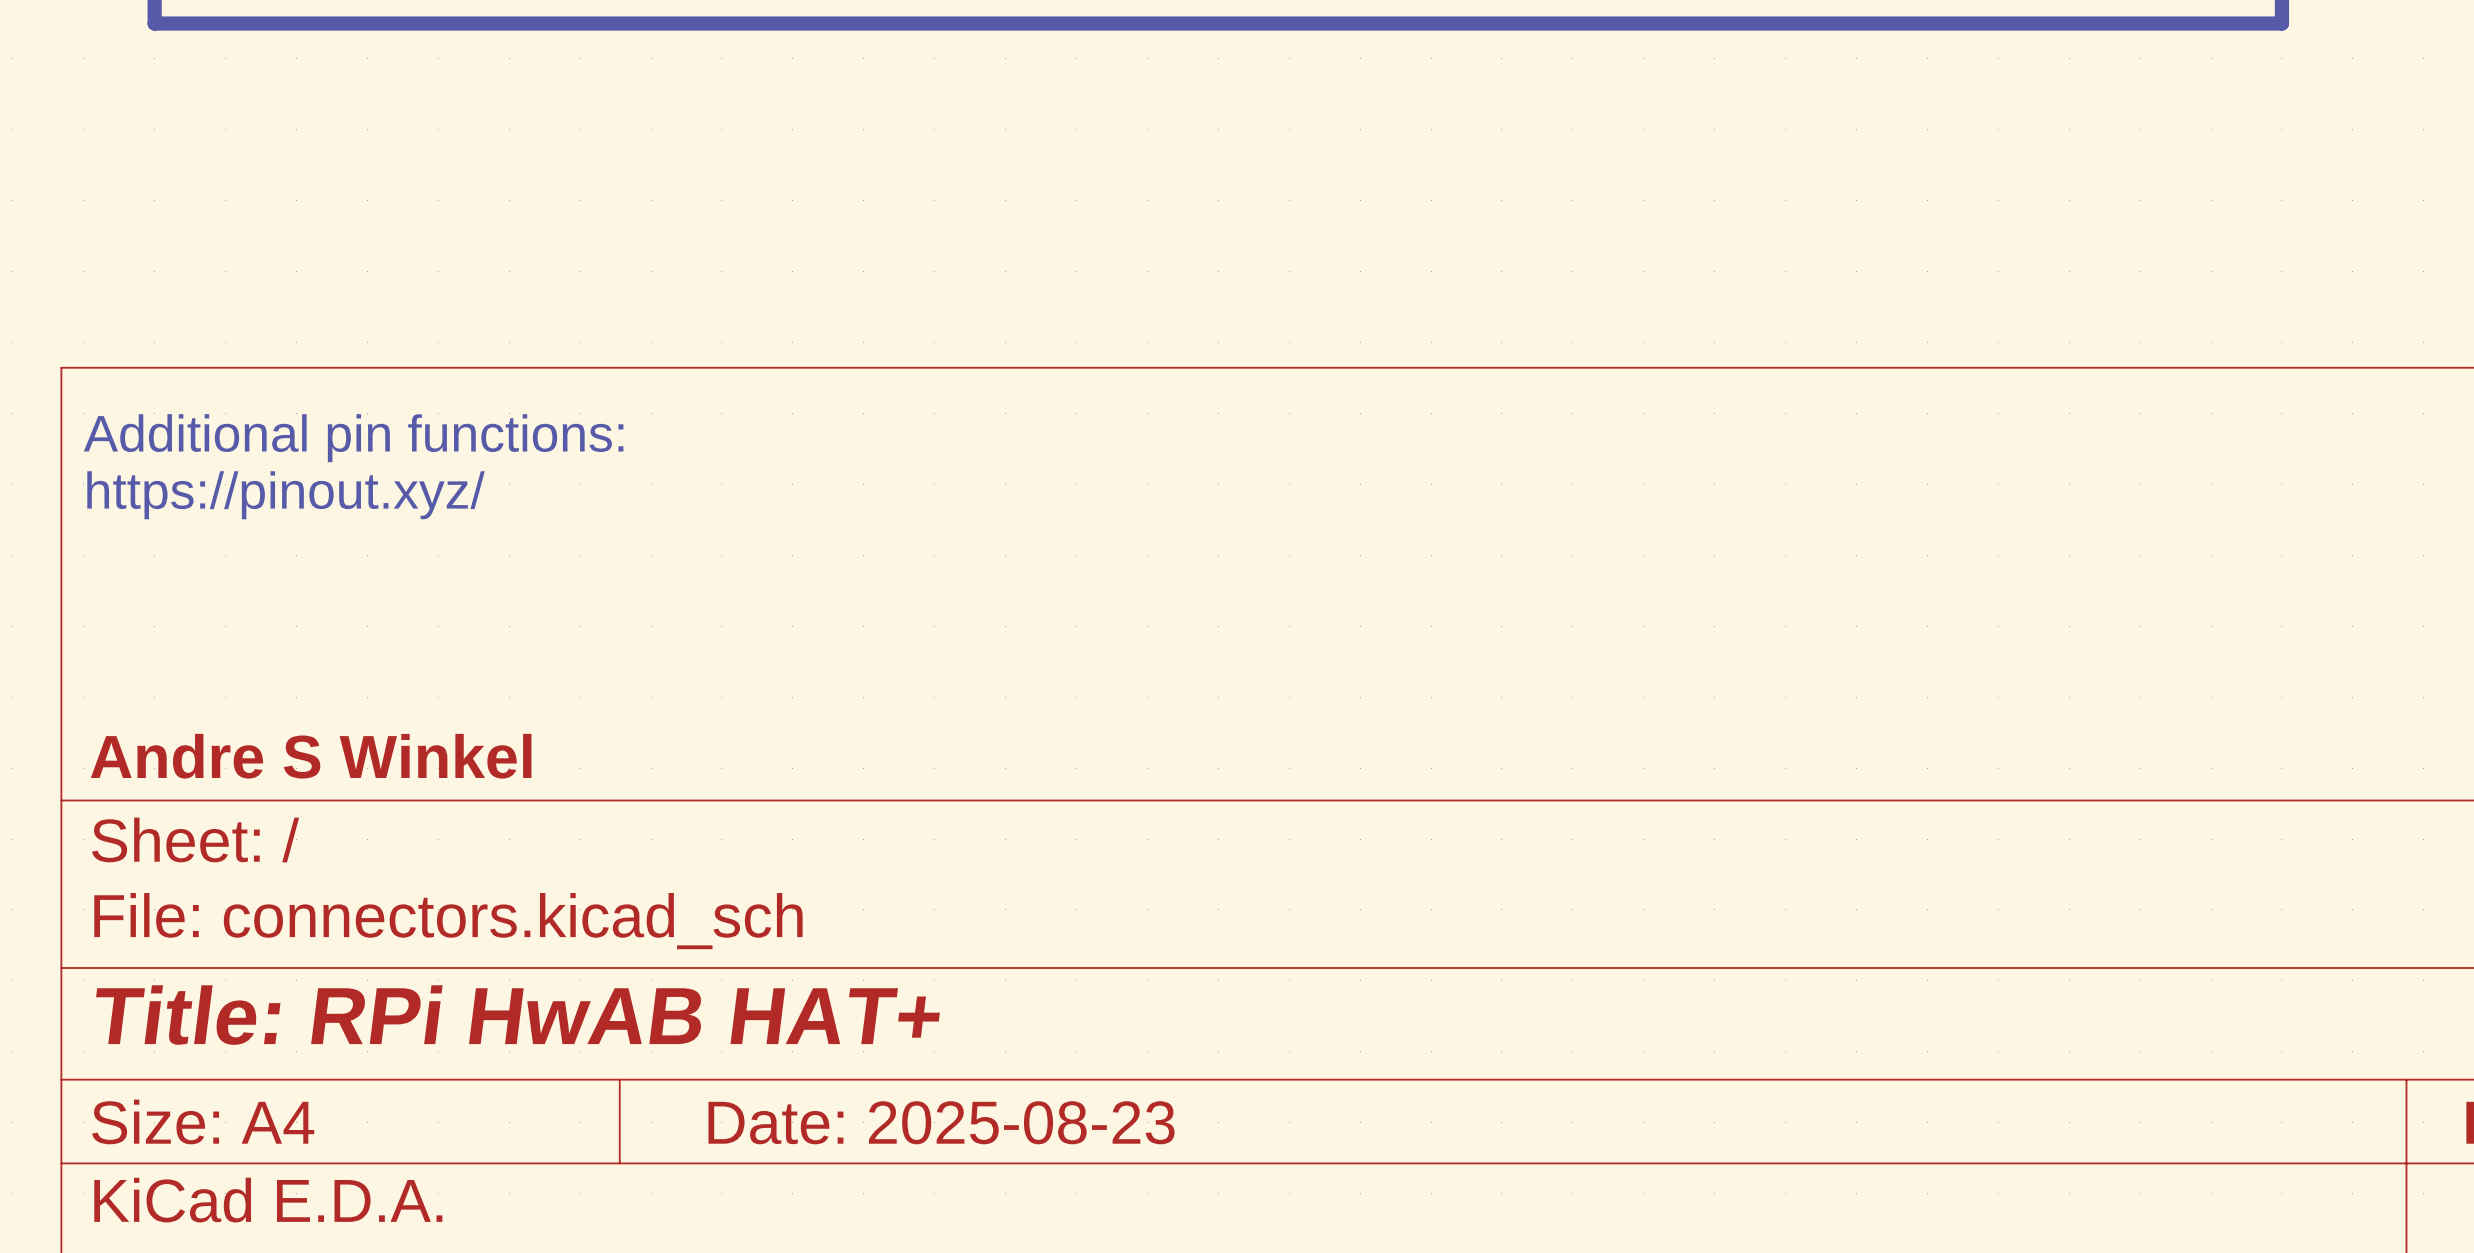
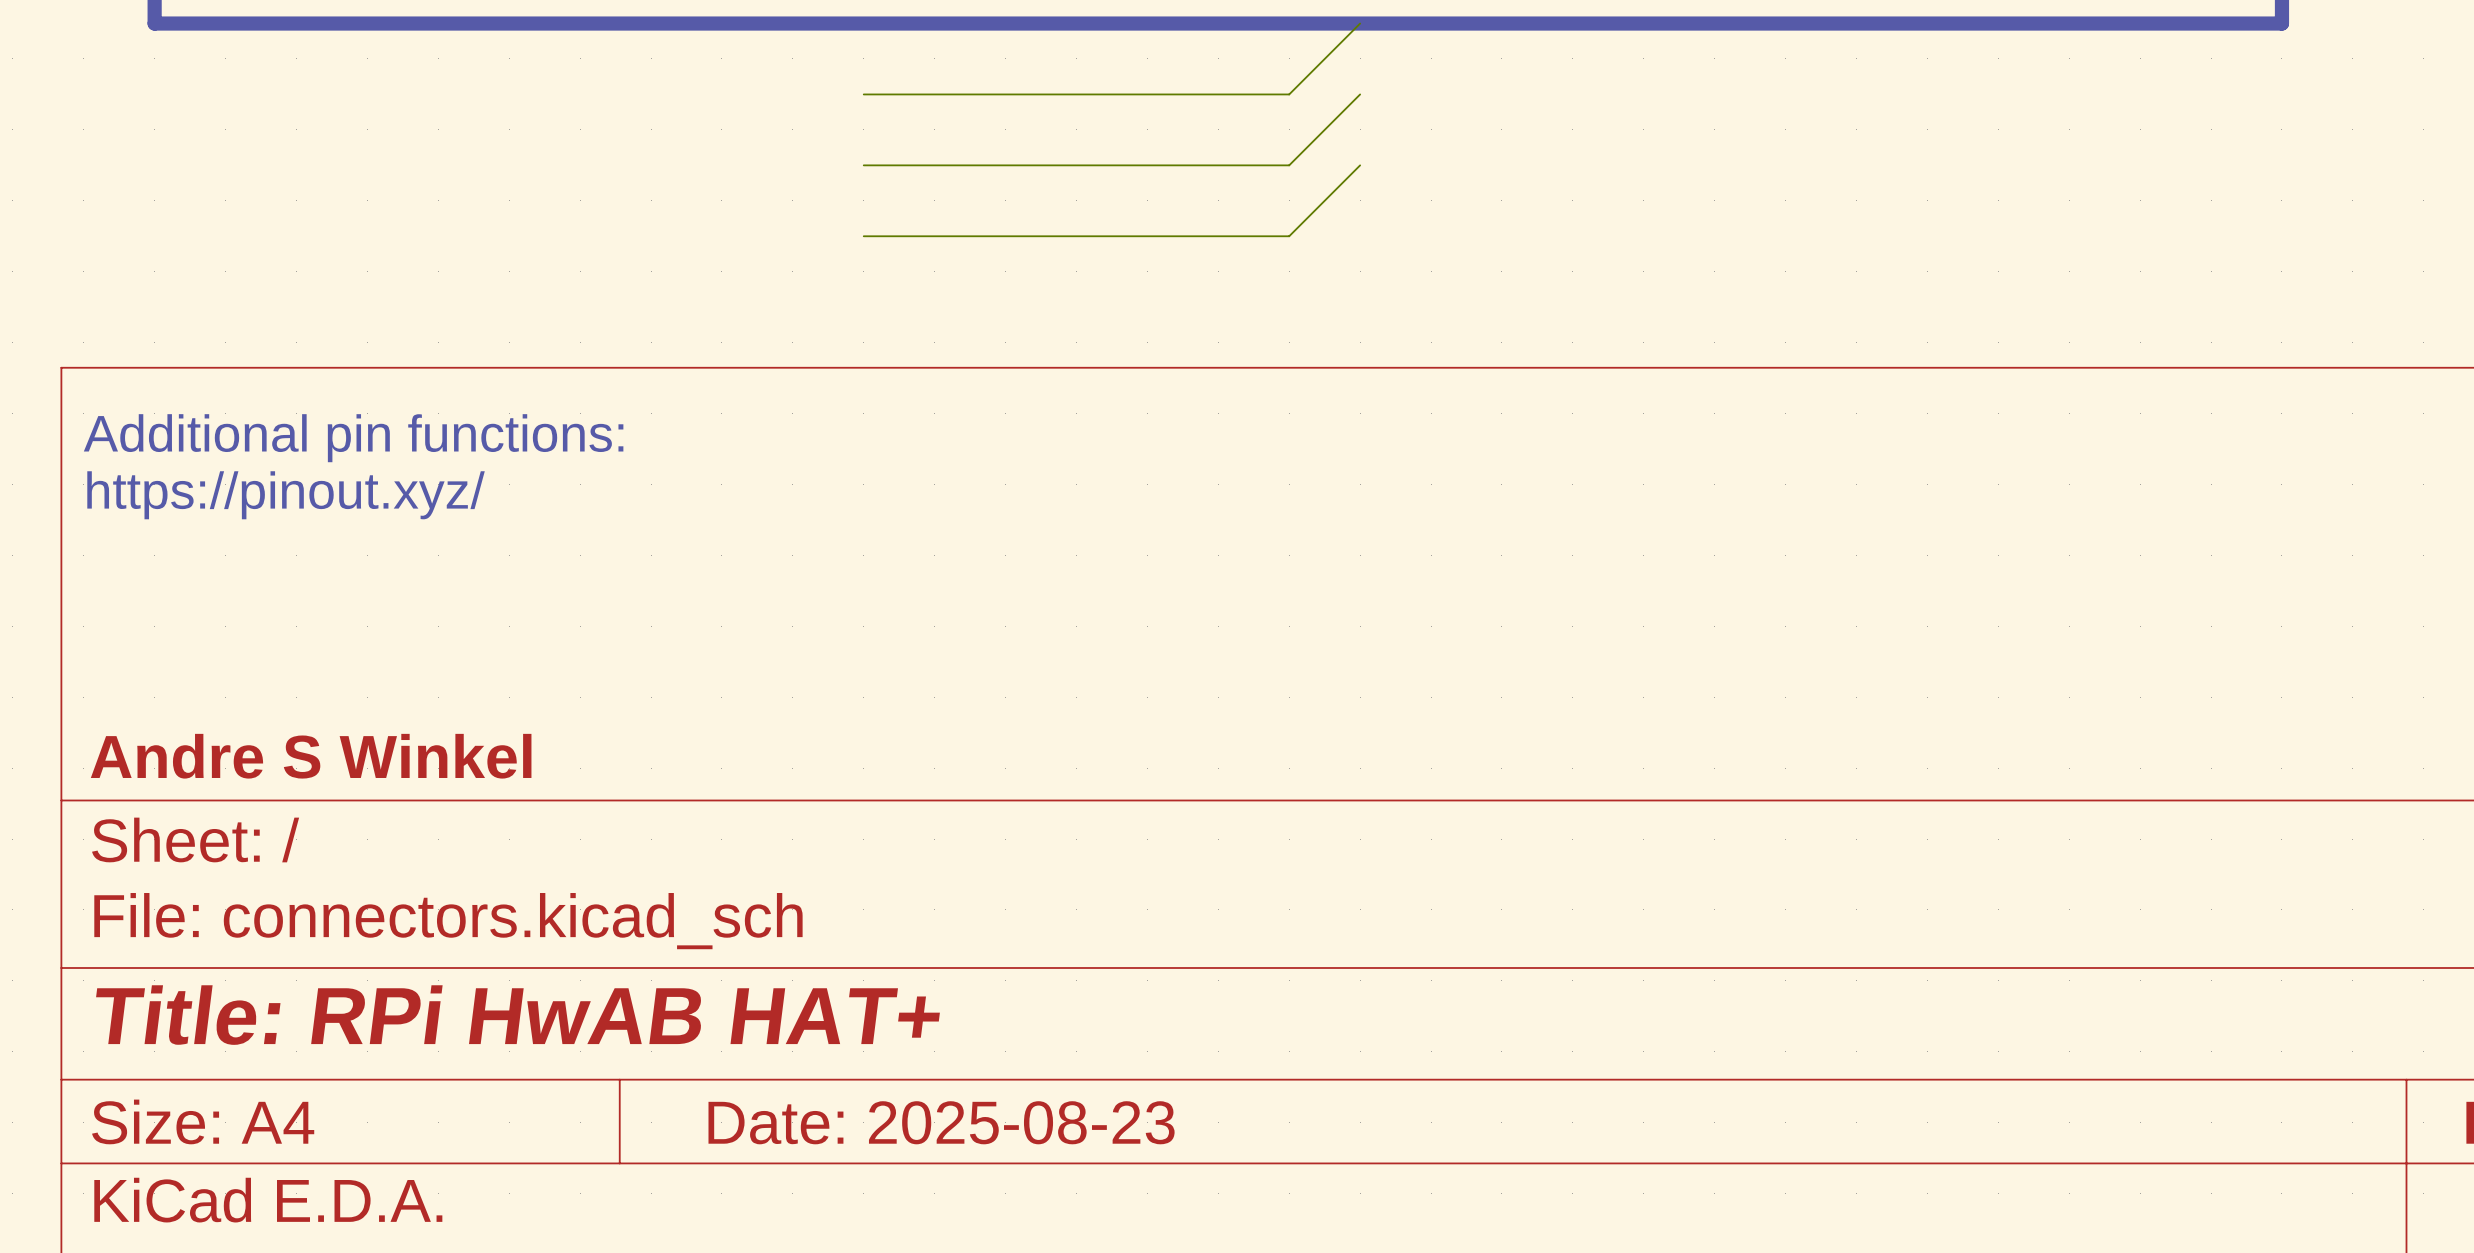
wire: none -> (1360, 23) (1289, 94) (863, 94)
wire: none -> (1360, 94) (1289, 165) (863, 165)
wire: none -> (1360, 165) (1289, 236) (863, 236)

